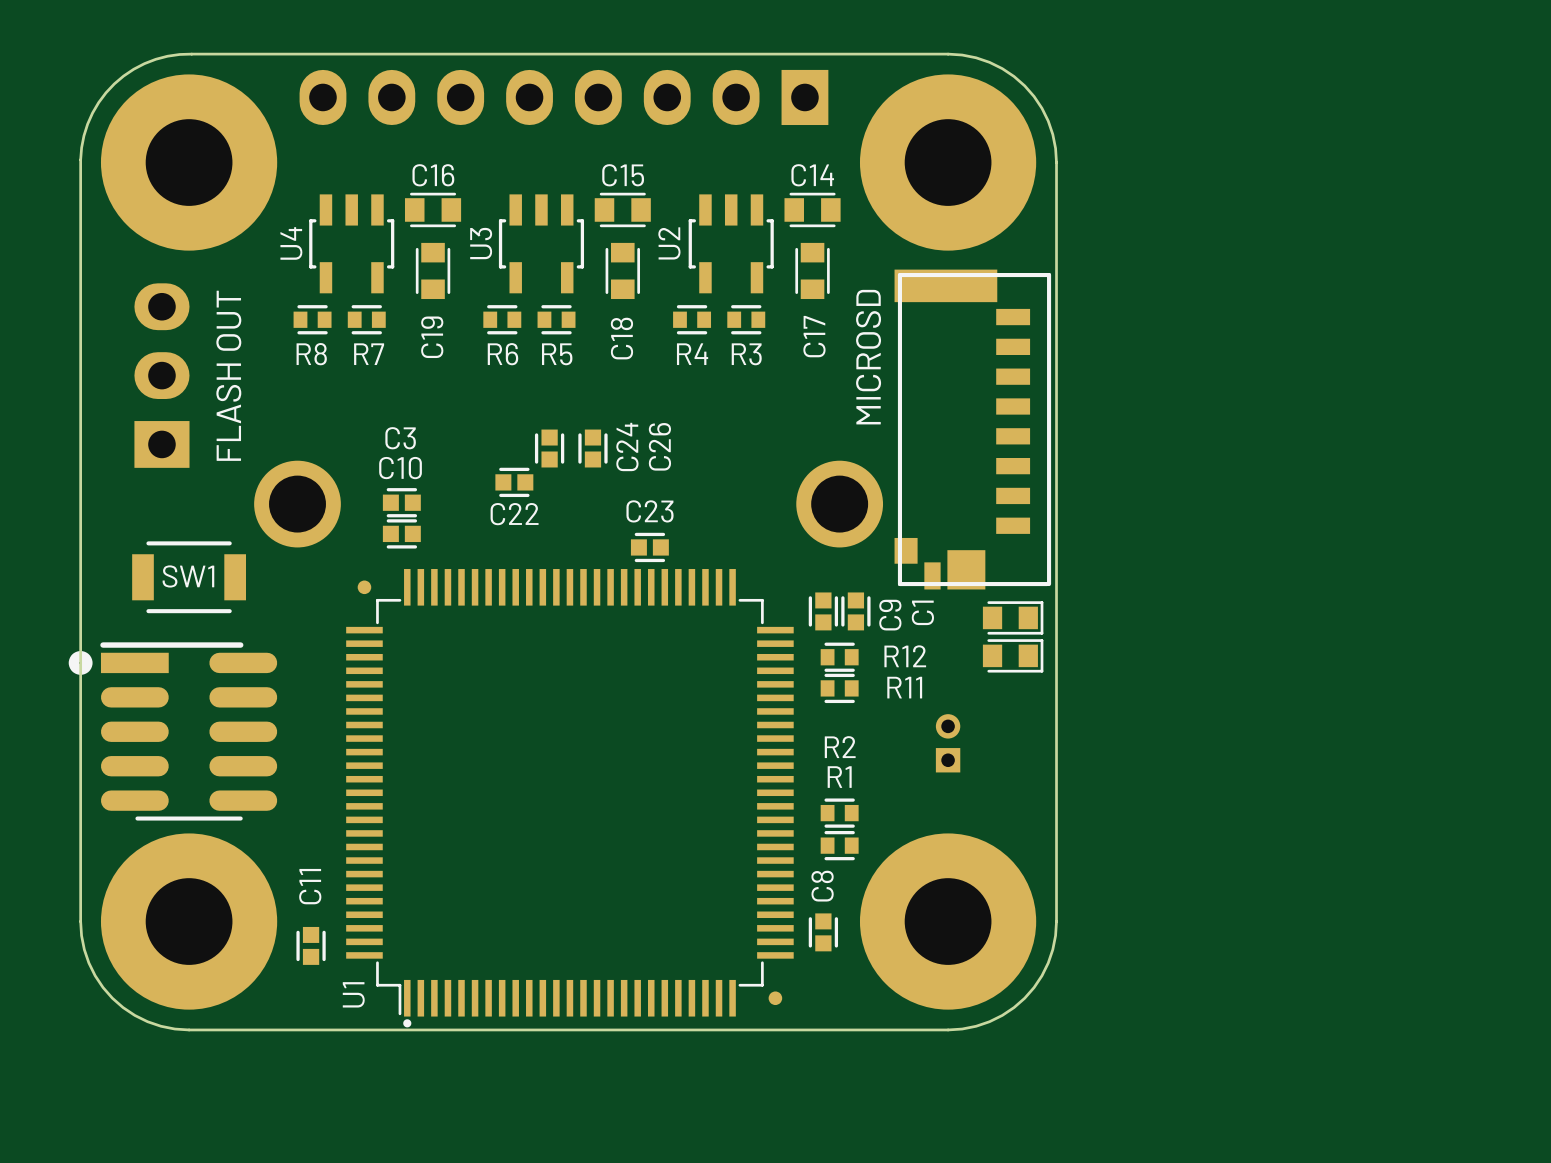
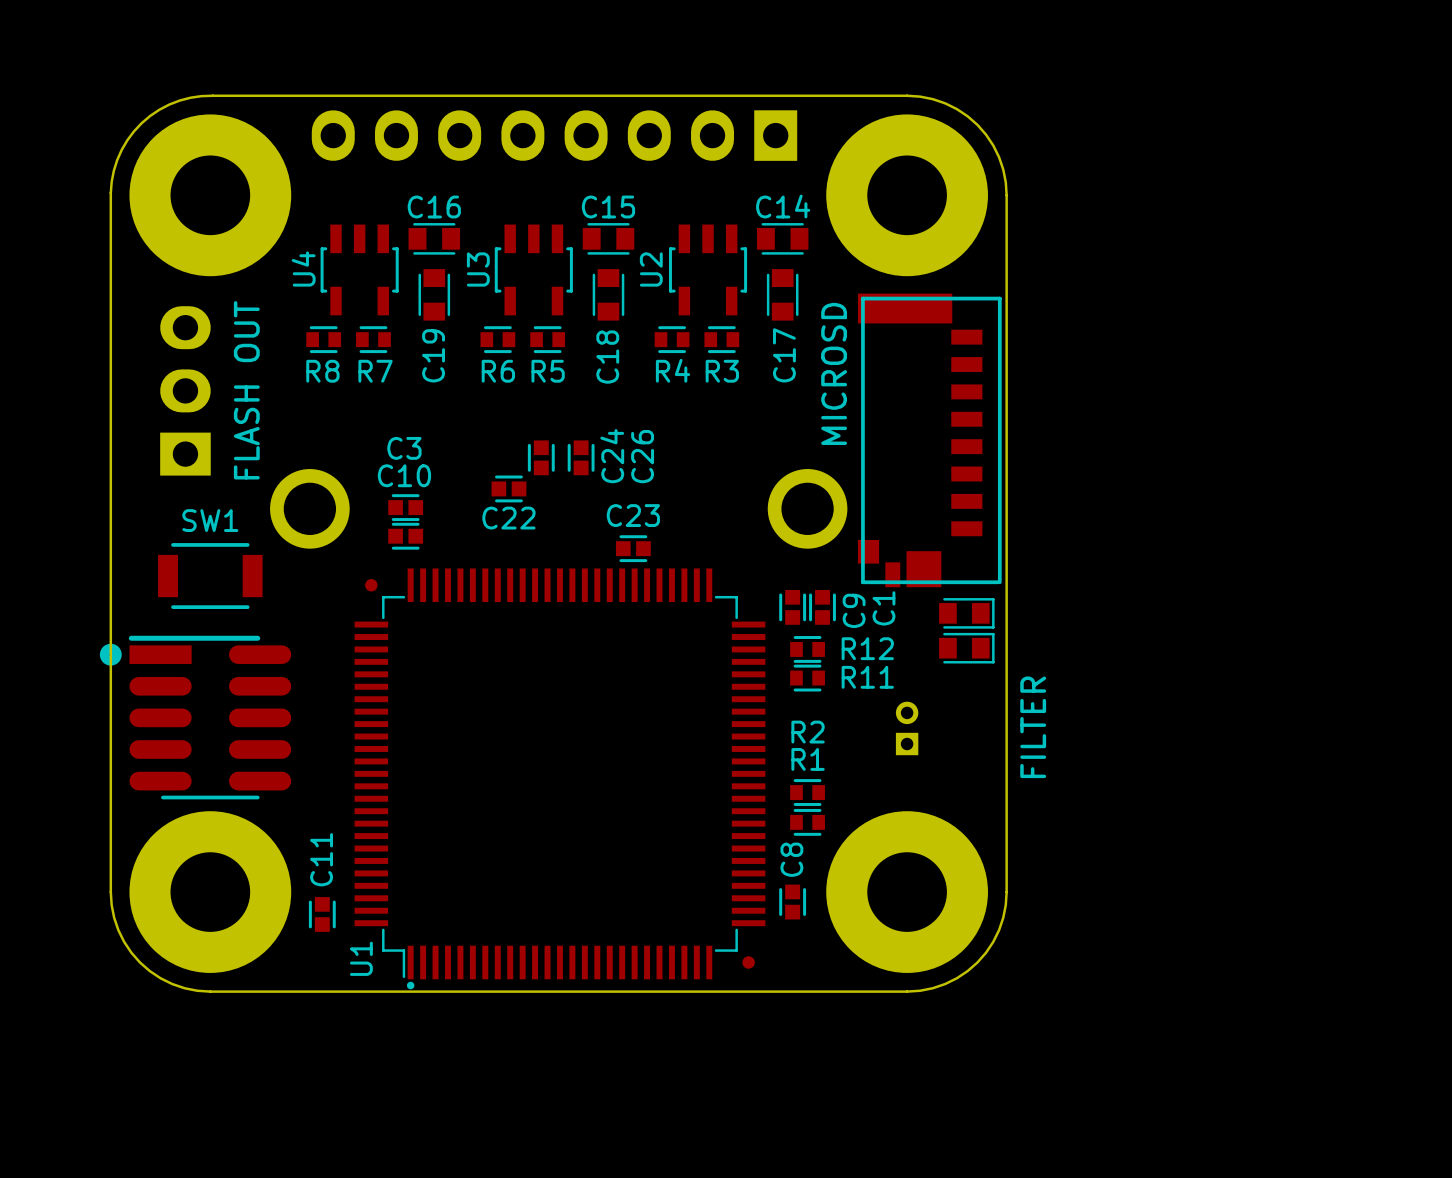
SW1 name position: SW1 (188, 576) -> SW1 (210, 520)
text: none -> FILTER (1033, 727)

